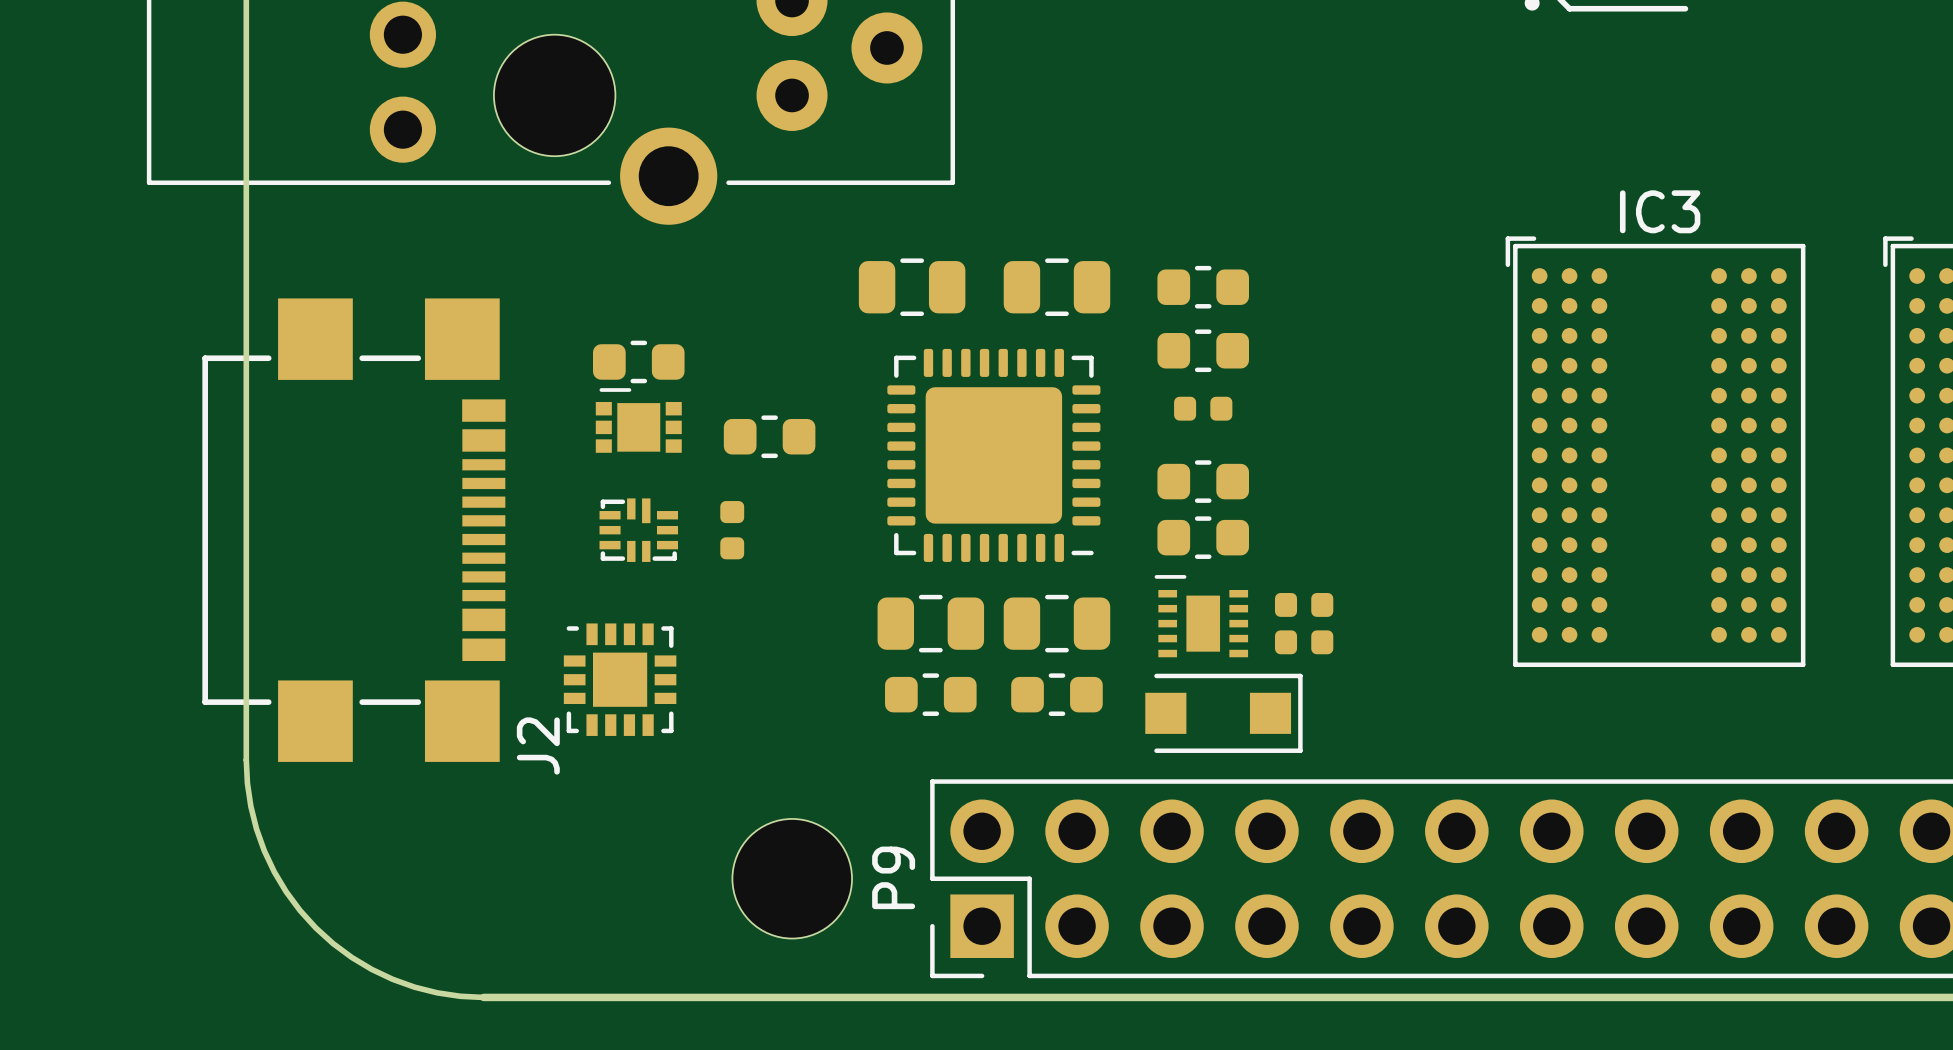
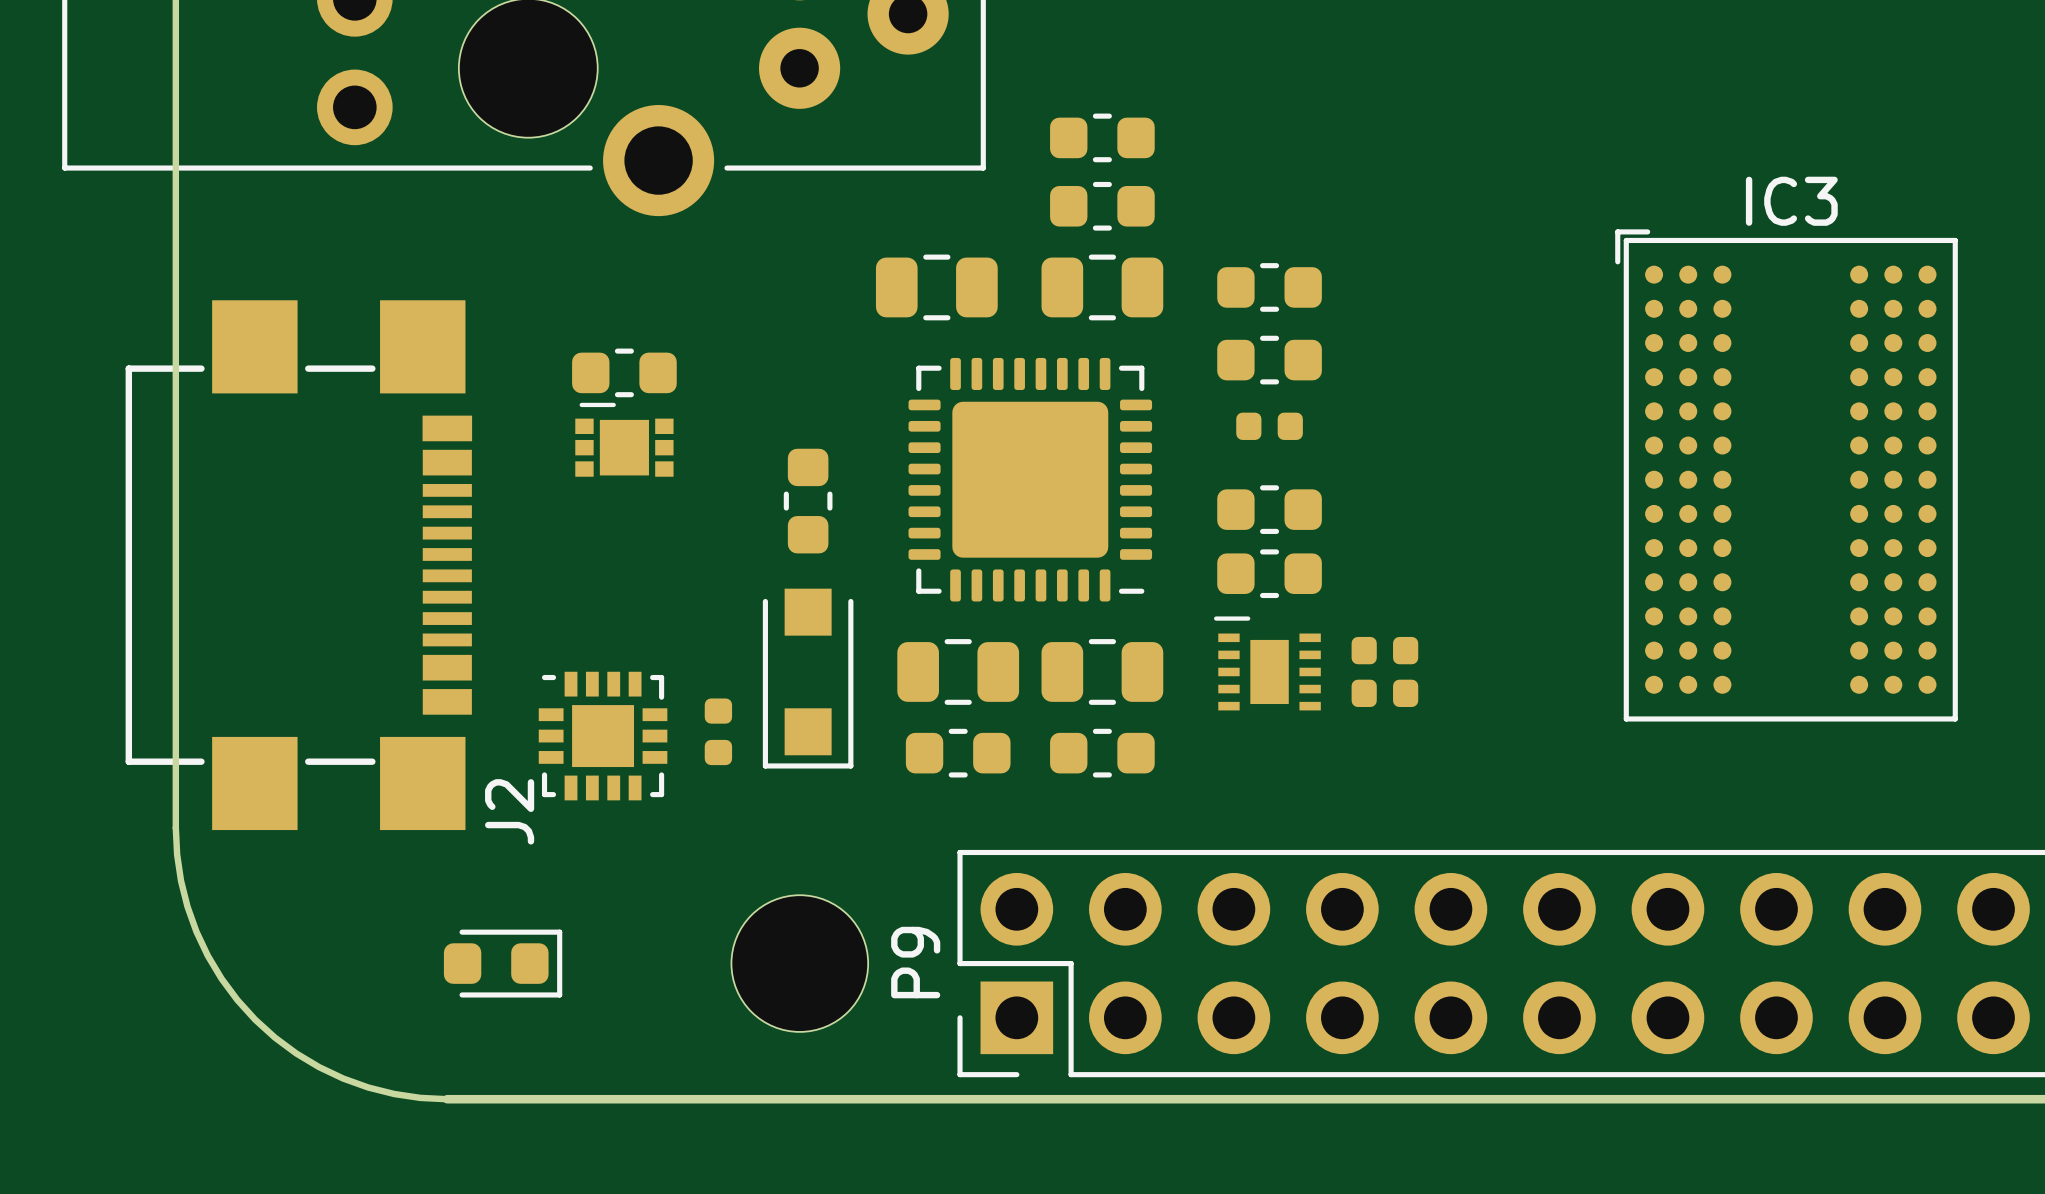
part: none -> (1102, 137)
part: none -> (1102, 206)
part rotation: 0° (769, 436) -> 90° clockwise (808, 501)
part: (638, 530) -> none
part position: (732, 530) -> (718, 731)
part rotation: 0° (1223, 713) -> 90° clockwise (808, 678)
part position: (1223, 713) -> (808, 678)
part: none -> (503, 963)

